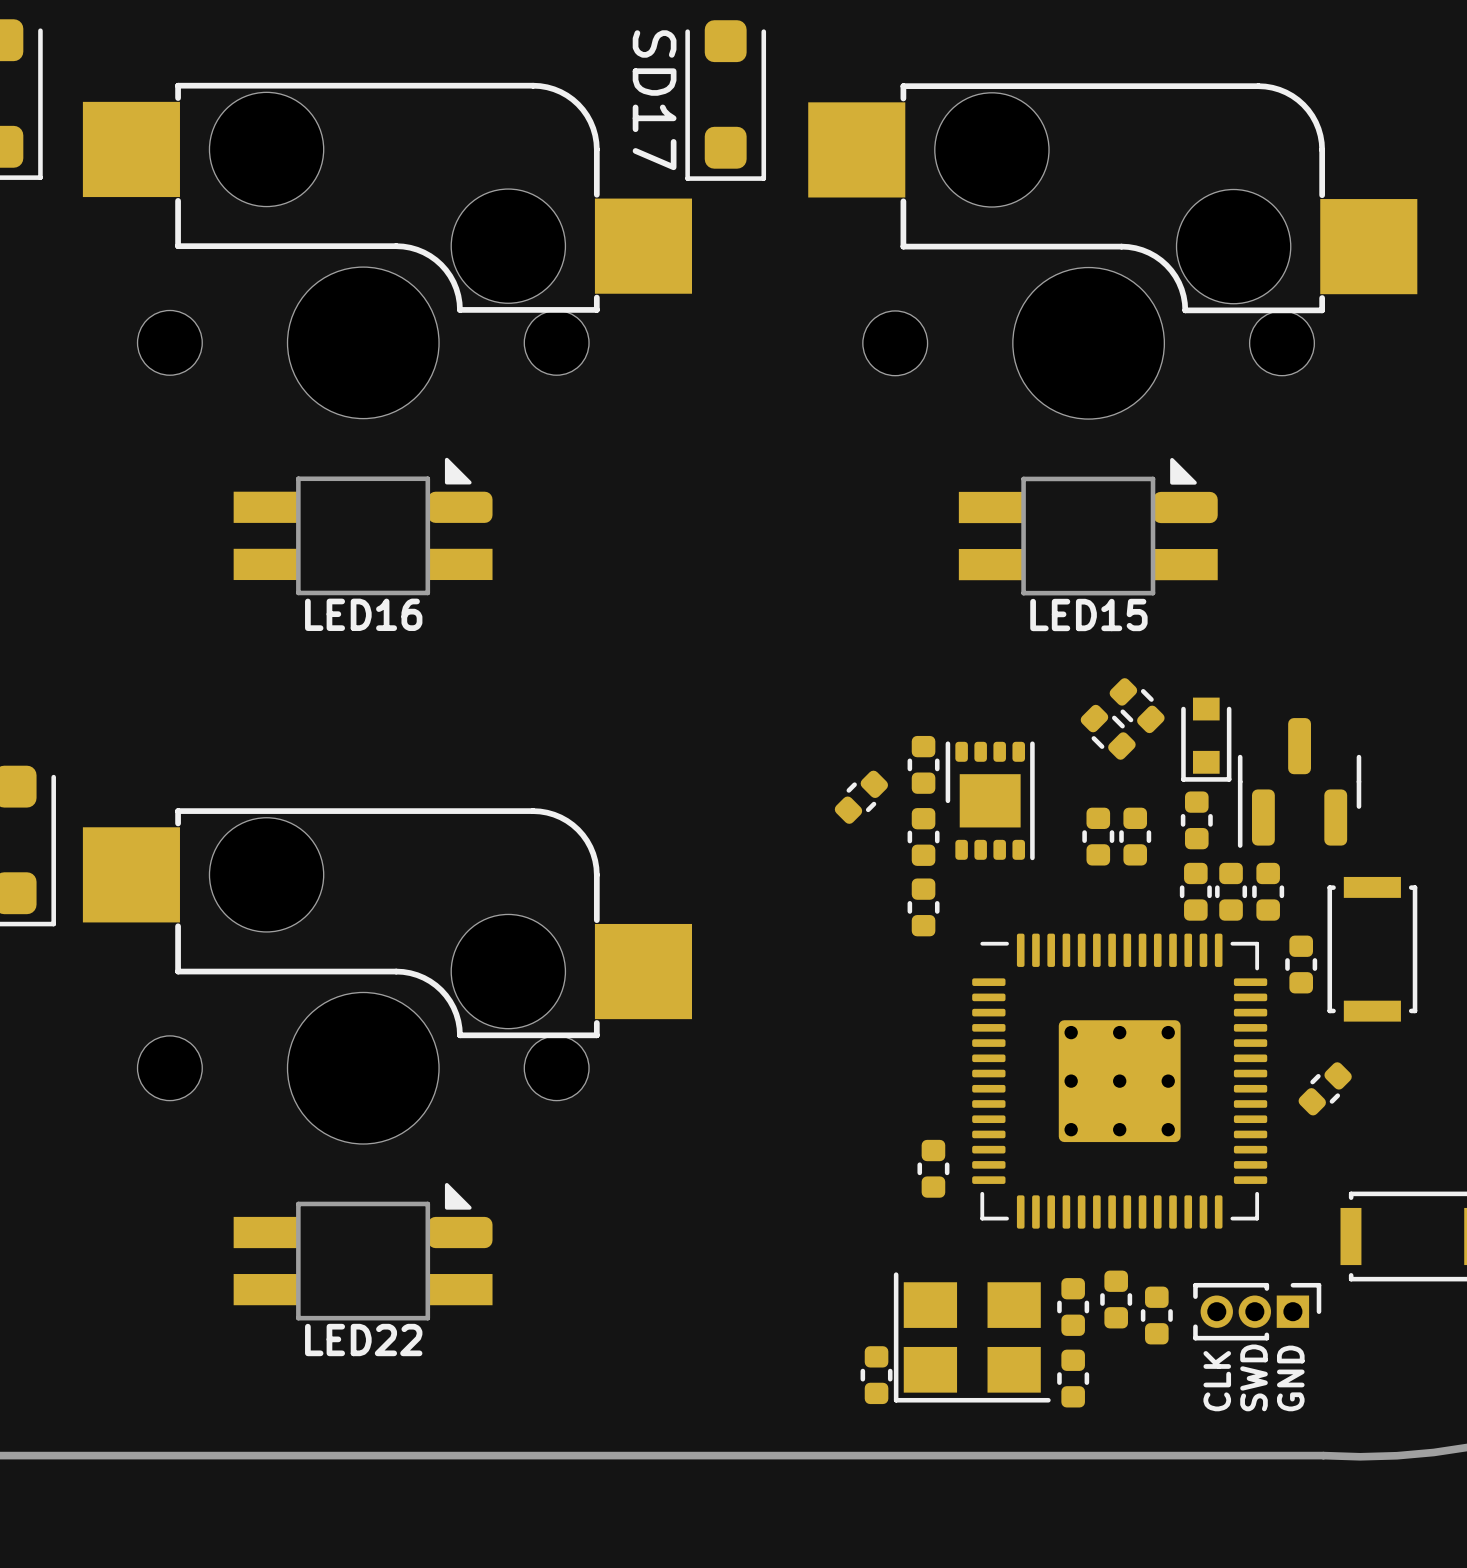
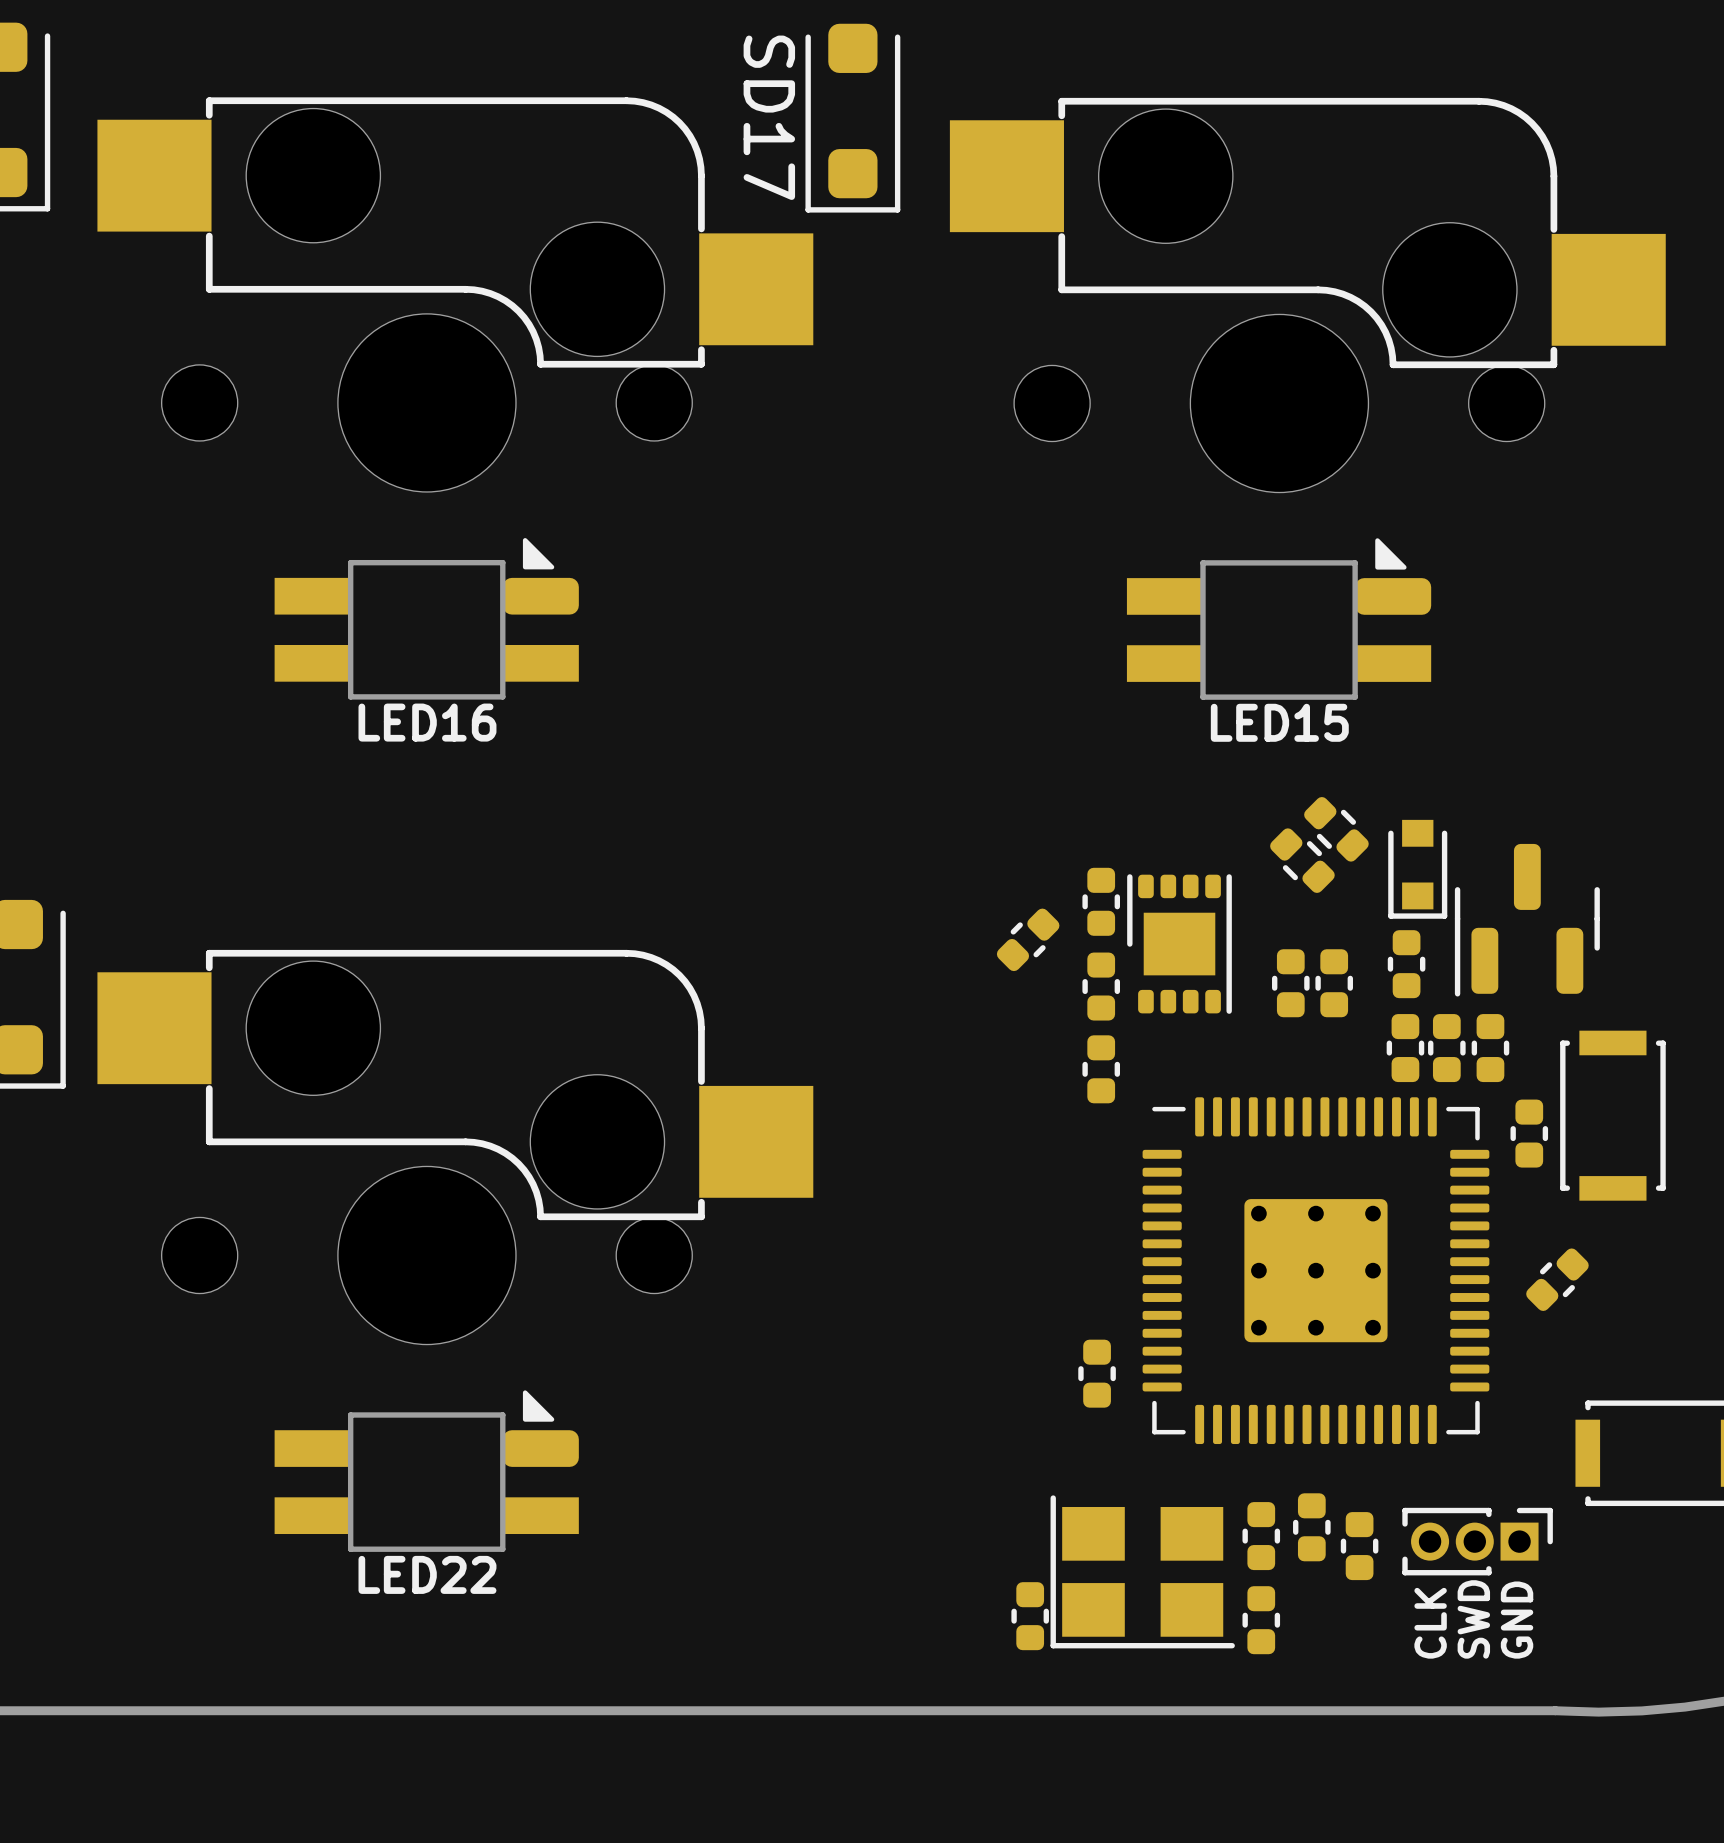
part position: (923, 764) -> (1101, 901)
part position: (861, 797) -> (1028, 939)
part position: (990, 800) -> (1179, 944)
part position: (923, 836) -> (1101, 986)
part position: (923, 907) -> (1101, 1069)

